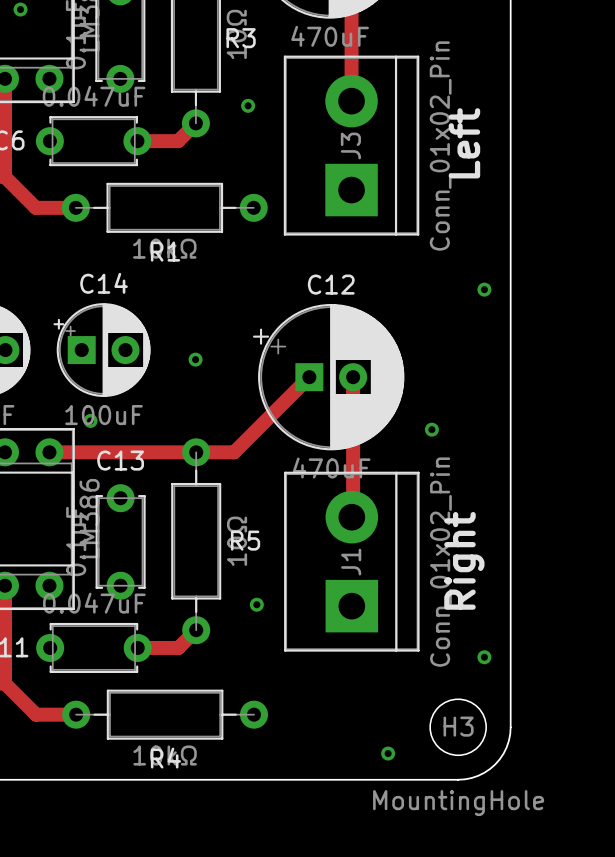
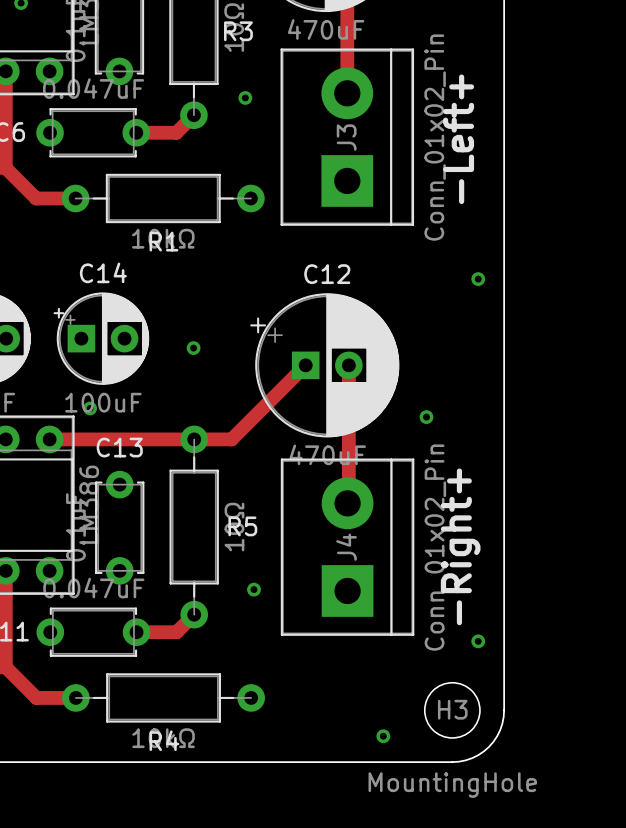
text: Left (464, 143) -> -Left+ (458, 139)
text: Right (464, 560) -> -Right+ (460, 546)
J1 name: J1 (351, 562) -> J4 (346, 547)

